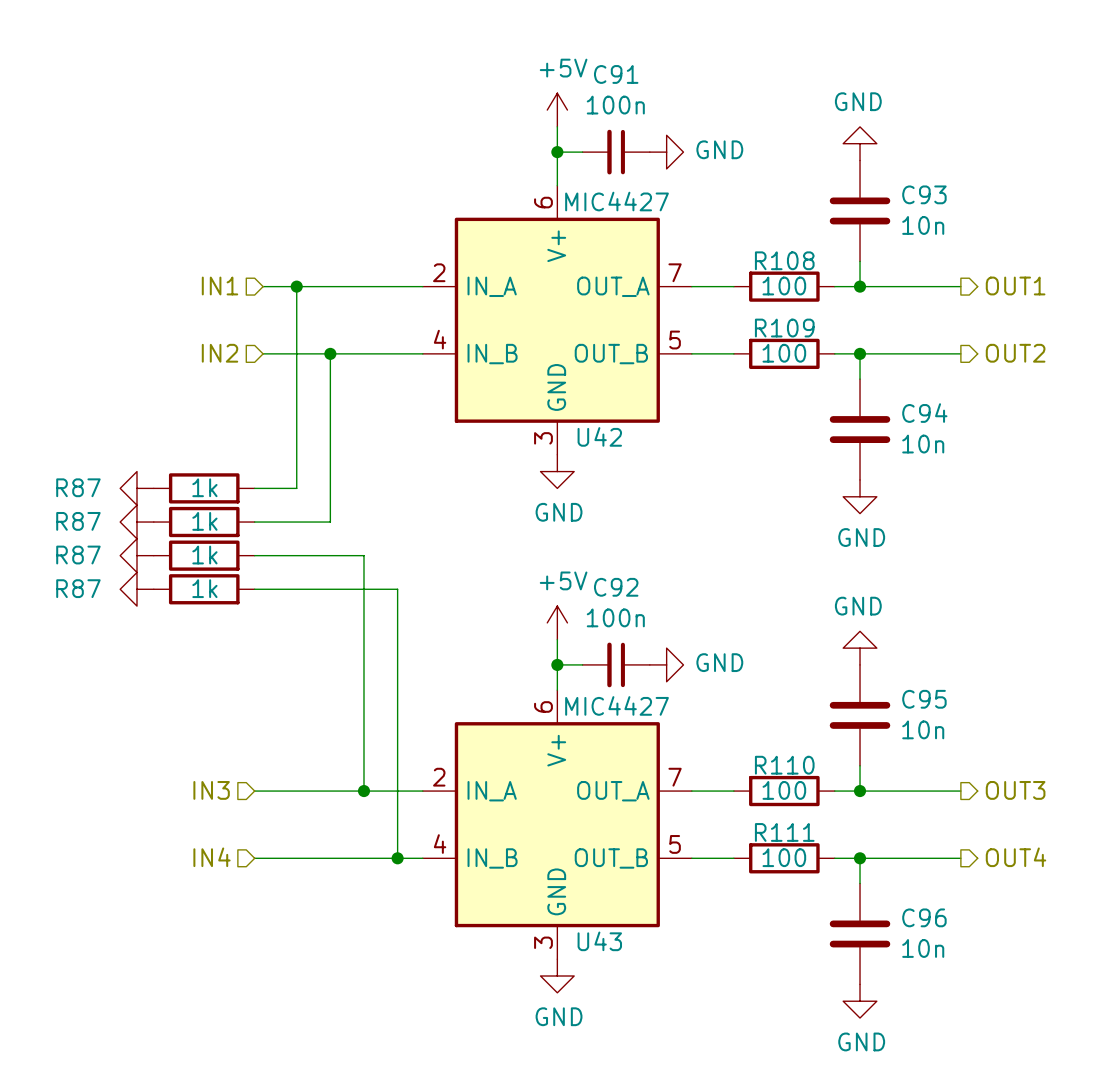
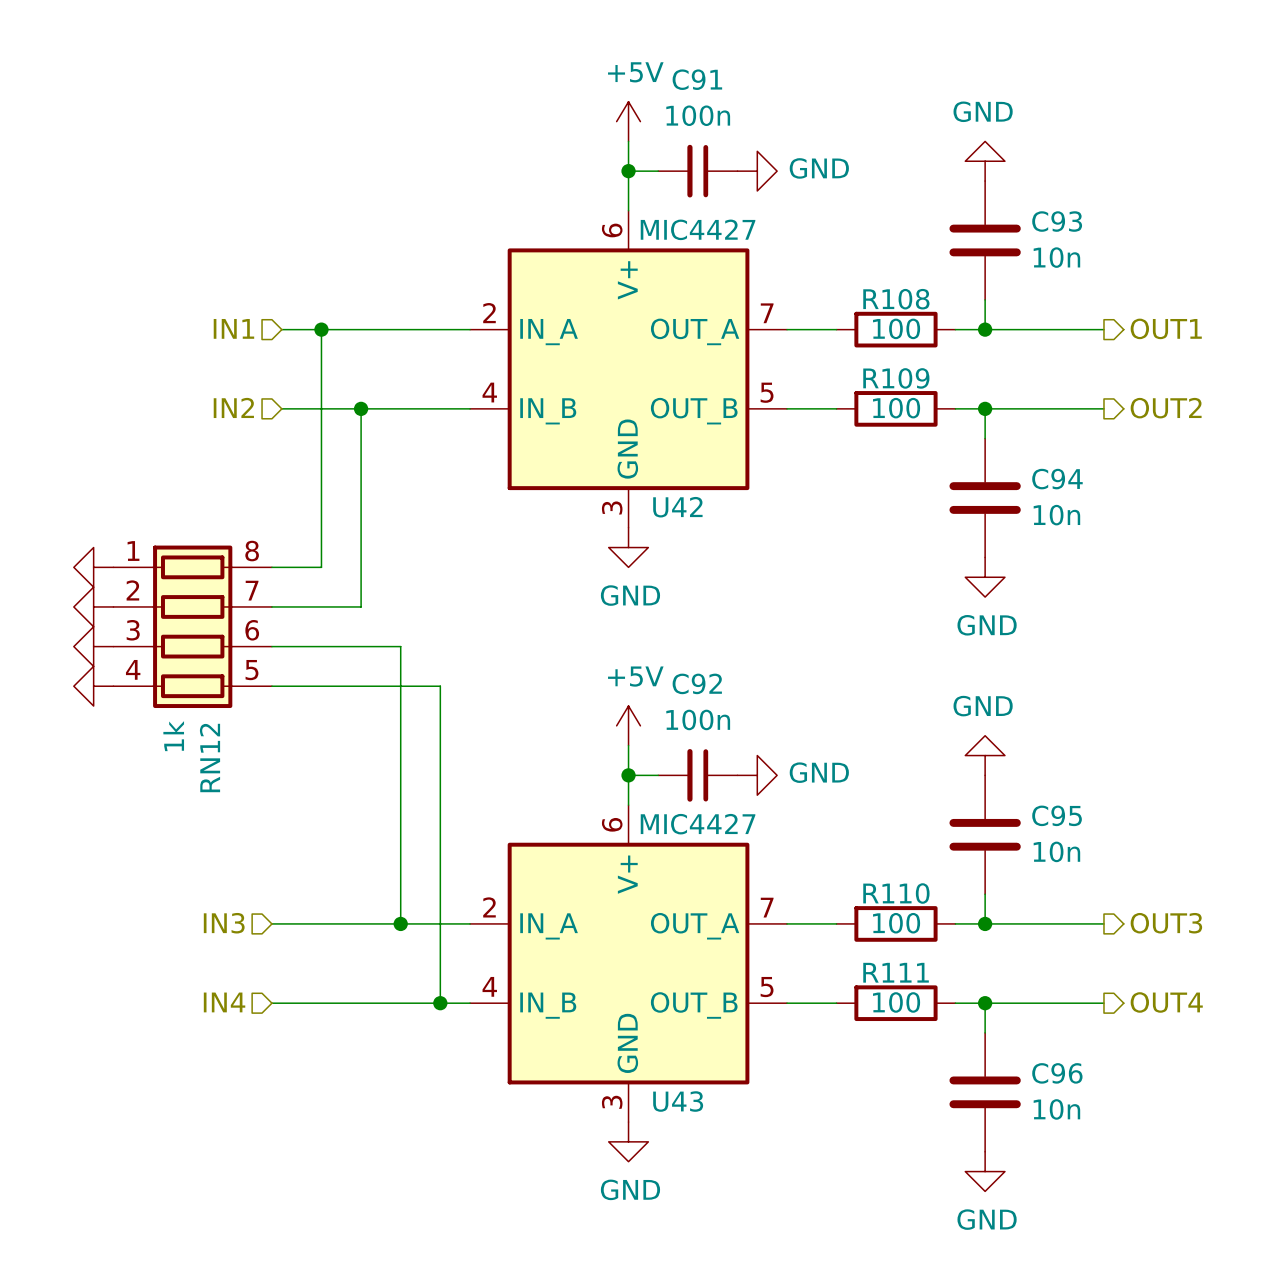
power symbol: none -> (93, 567)
power symbol: (137, 488) -> none
R87: 1k (204, 488) -> none
power symbol: none -> (93, 606)
power symbol: (137, 522) -> none
R87: 1k (204, 522) -> none
RN12: none -> 1k (192, 626)
power symbol: none -> (93, 646)
power symbol: (137, 555) -> none
R87: 1k (204, 555) -> none
power symbol: none -> (93, 686)
power symbol: (137, 589) -> none
R87: 1k (204, 589) -> none

